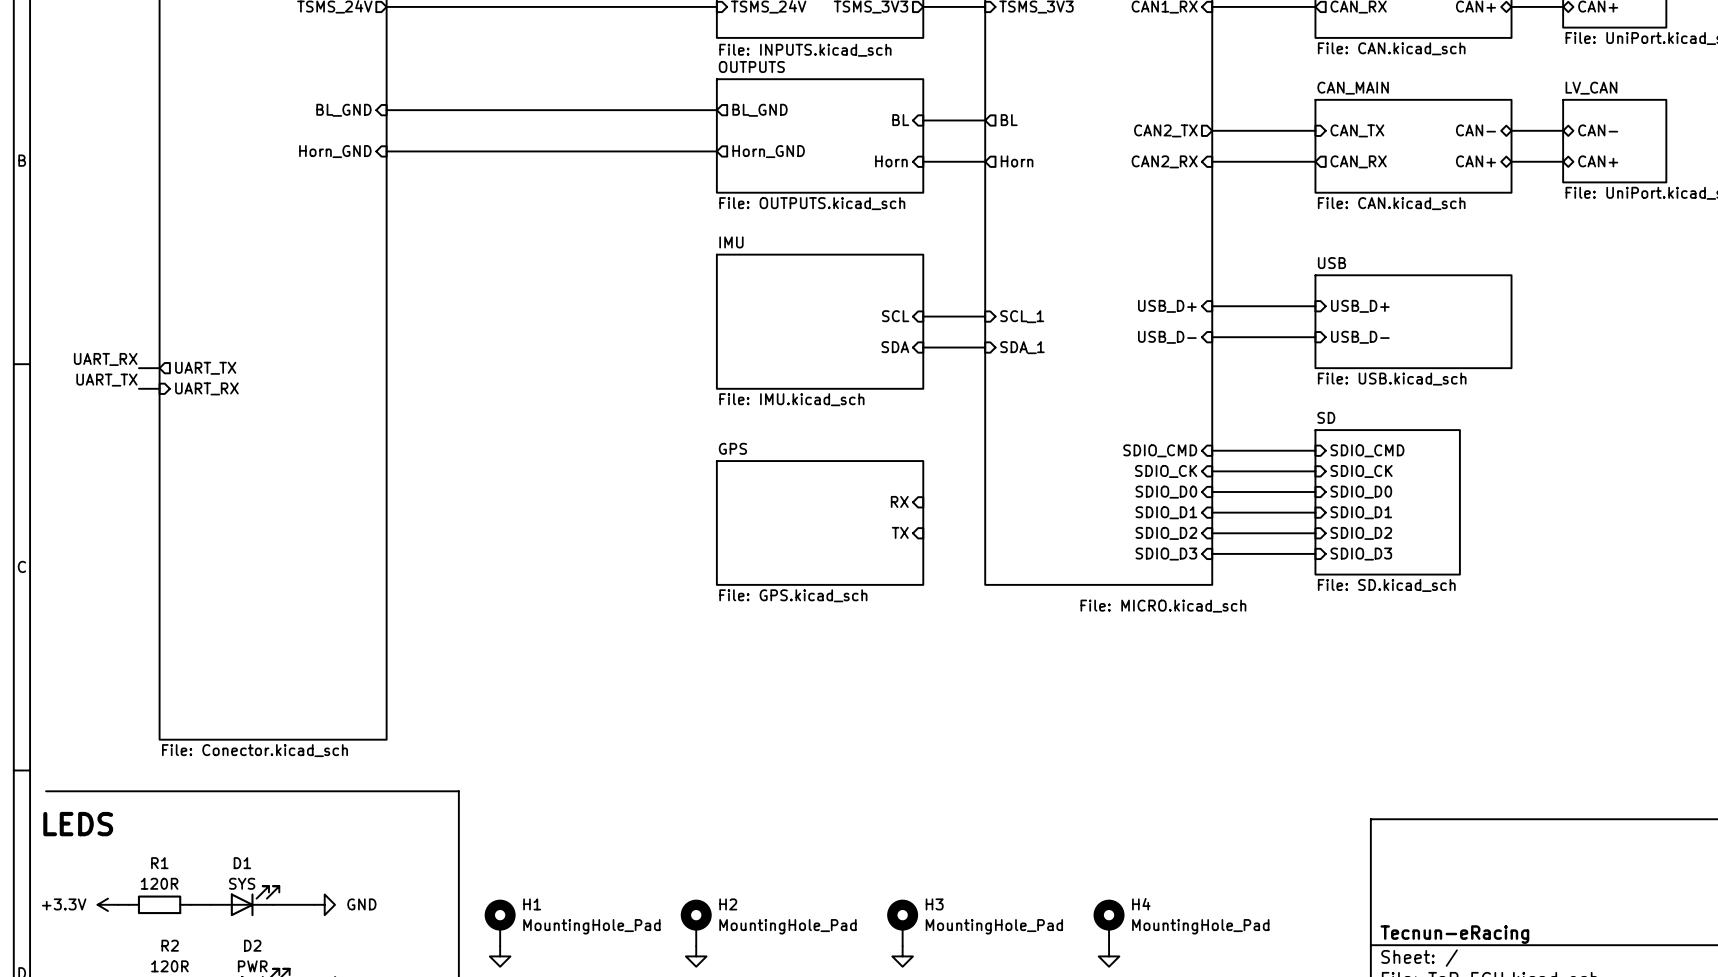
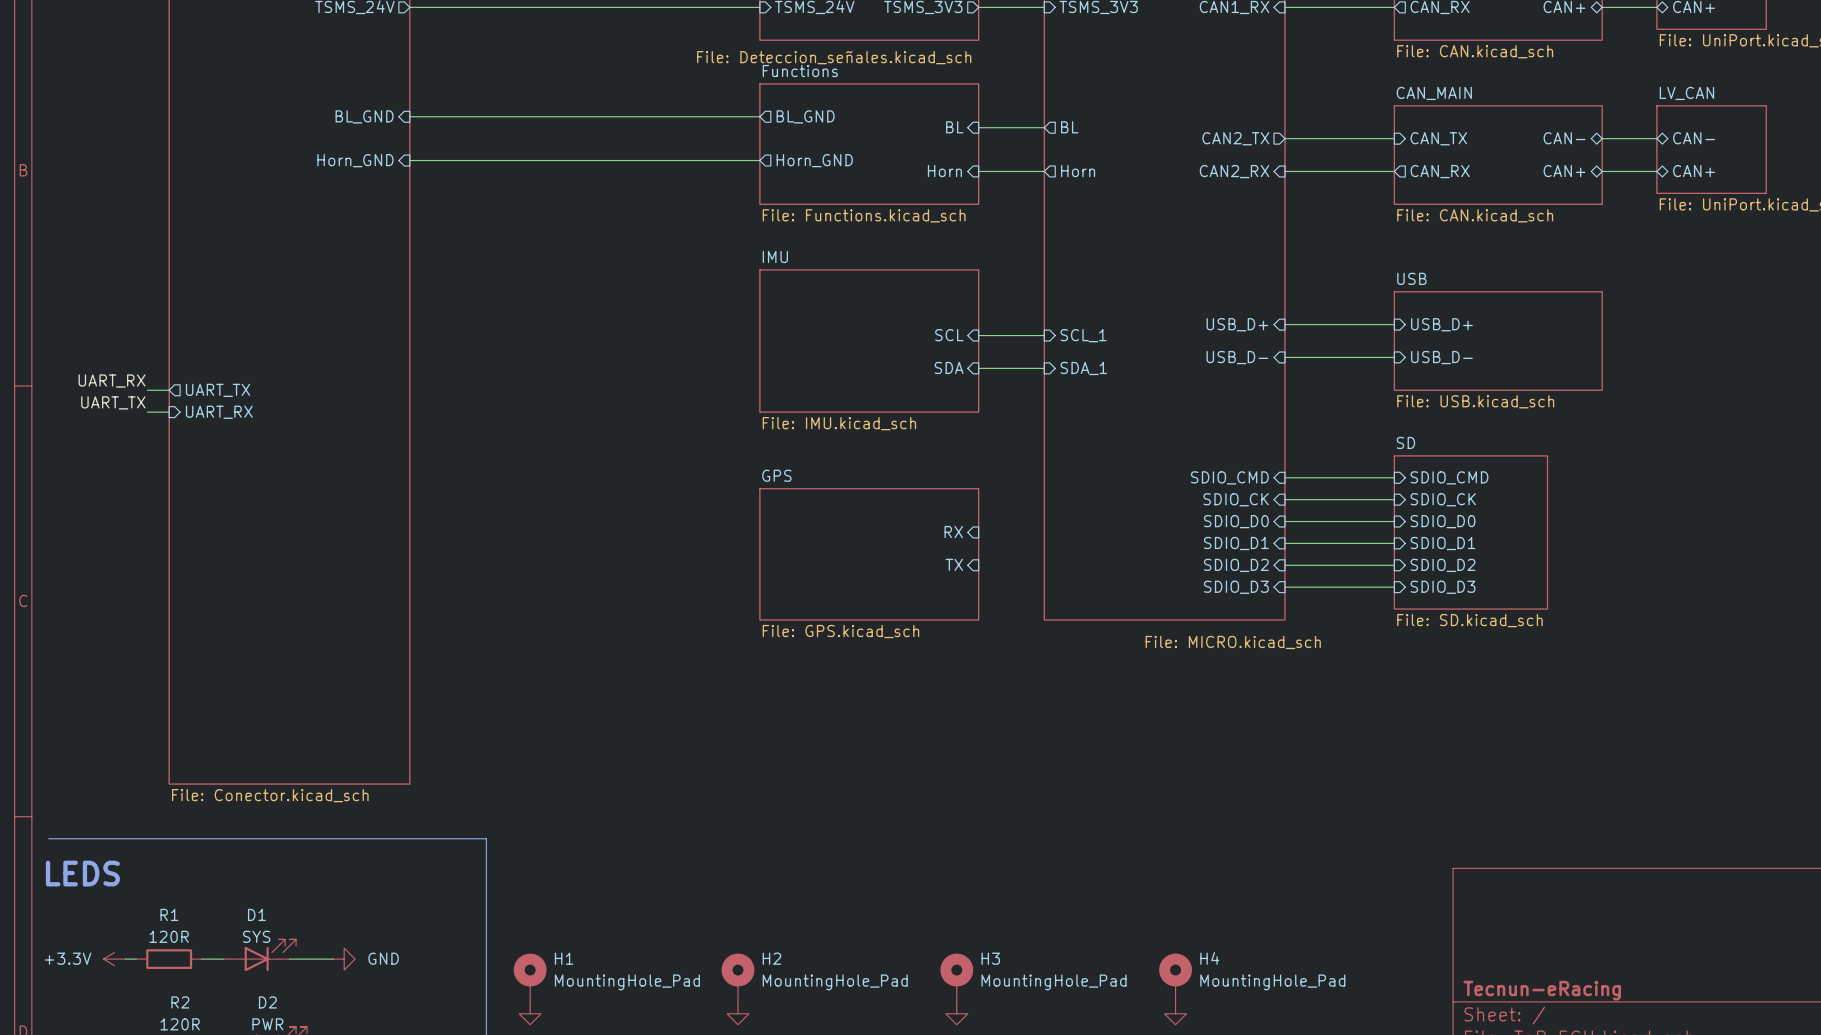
sheet value: File: INPUTS.kicad_sch (805, 50) -> File: Deteccion_señales.kicad_sch (834, 57)
sheet OUTPUTS name: OUTPUTS (751, 66) -> Functions (800, 71)
sheet OUTPUTS value: File: OUTPUTS.kicad_sch (812, 203) -> File: Functions.kicad_sch (864, 215)

